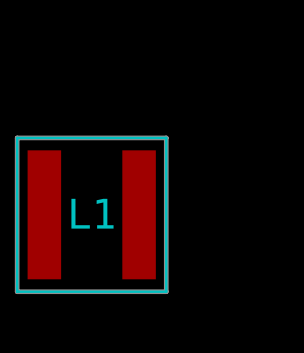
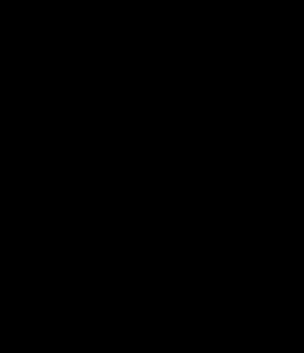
L1: (91, 214) -> none

